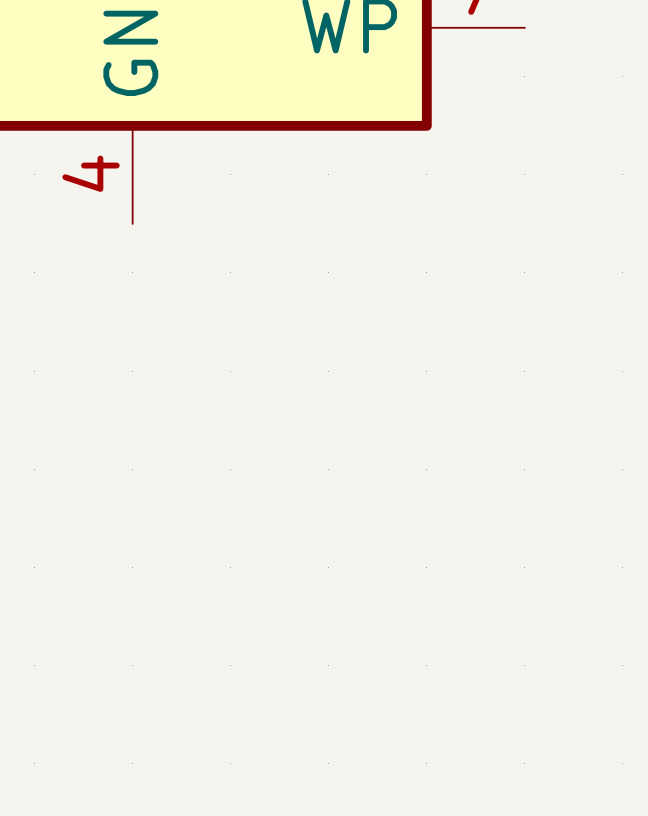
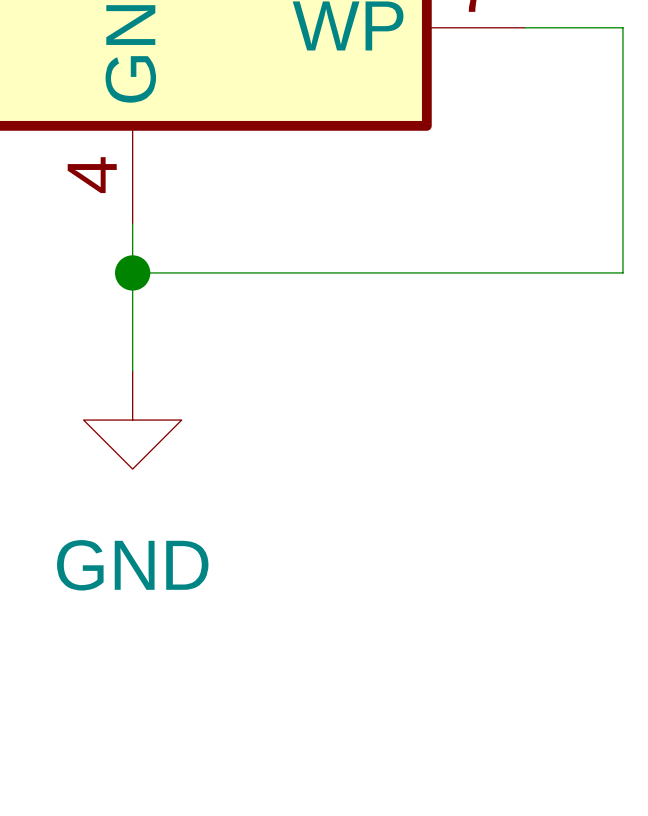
wire: none -> (524, 27) (622, 27) (622, 272) (132, 272)
wire: none -> (132, 223) (132, 371)
junction: none -> (132, 272)
power symbol: none -> GND (132, 420)

